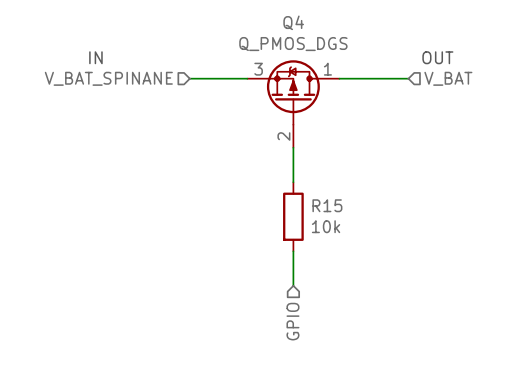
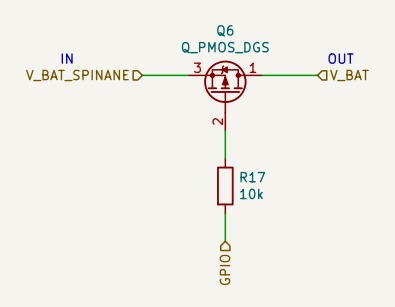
Q4 name: Q4 (293, 22) -> Q6 (225, 30)
R15 name: R15 (327, 205) -> R17 (252, 177)

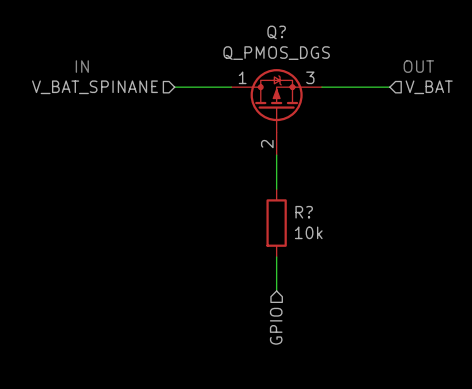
Q6: Q_PMOS_DGS (225, 95) -> none
Q?: none -> Q_PMOS_DGS (276, 112)
R17 name: R17 (252, 177) -> R? (304, 212)

